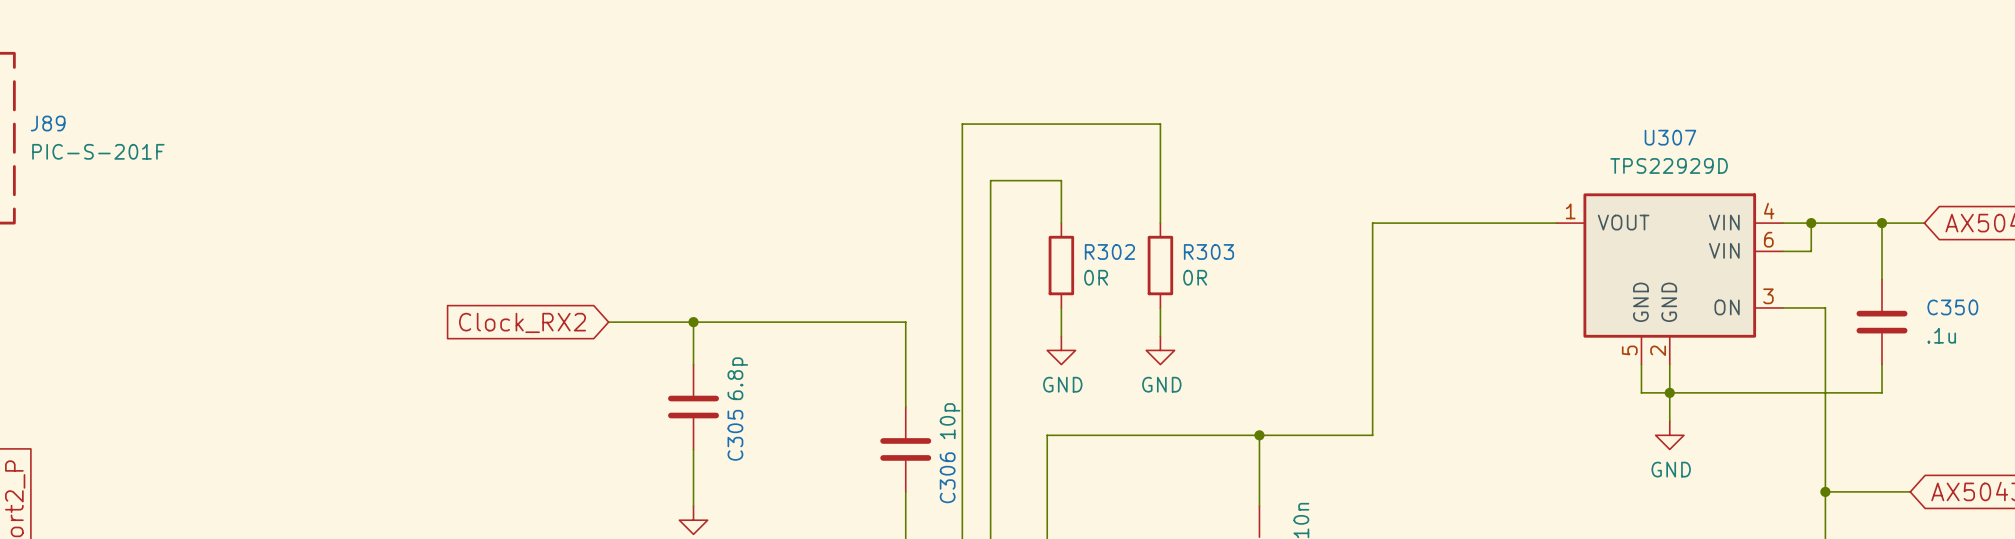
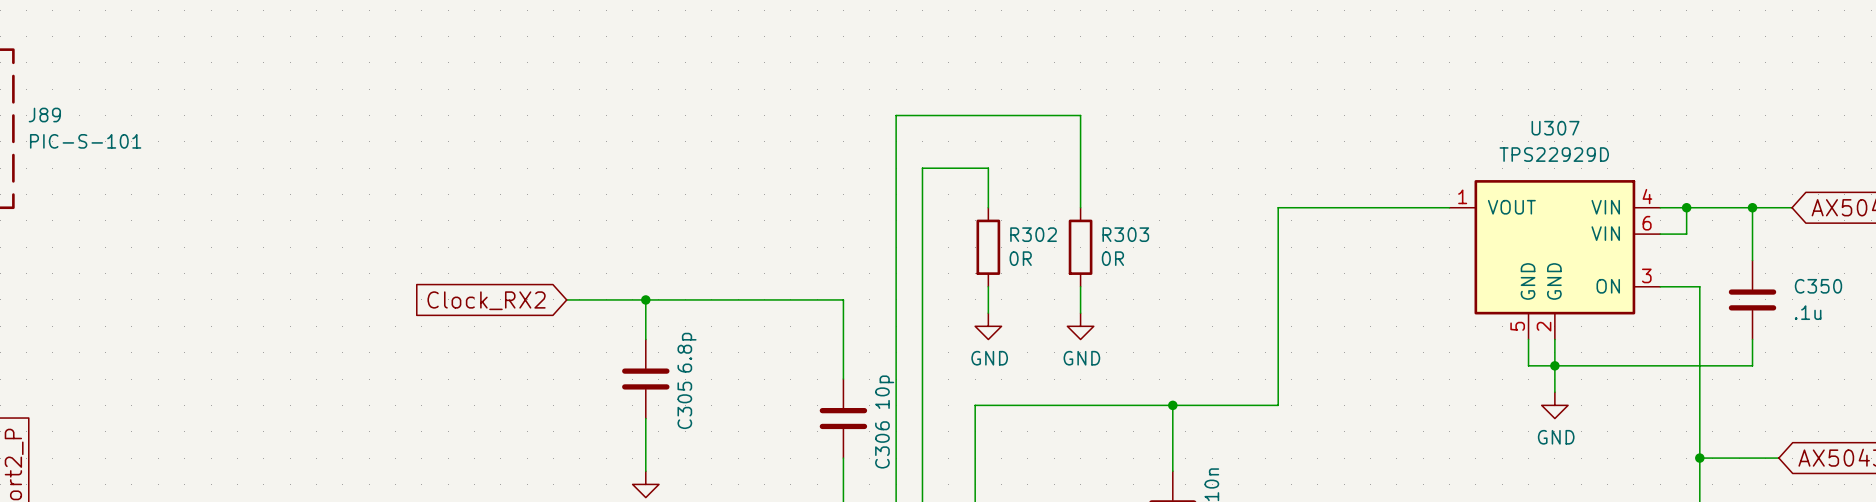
J89 value: PIC-S-201F (98, 151) -> PIC-S-101 (85, 141)

